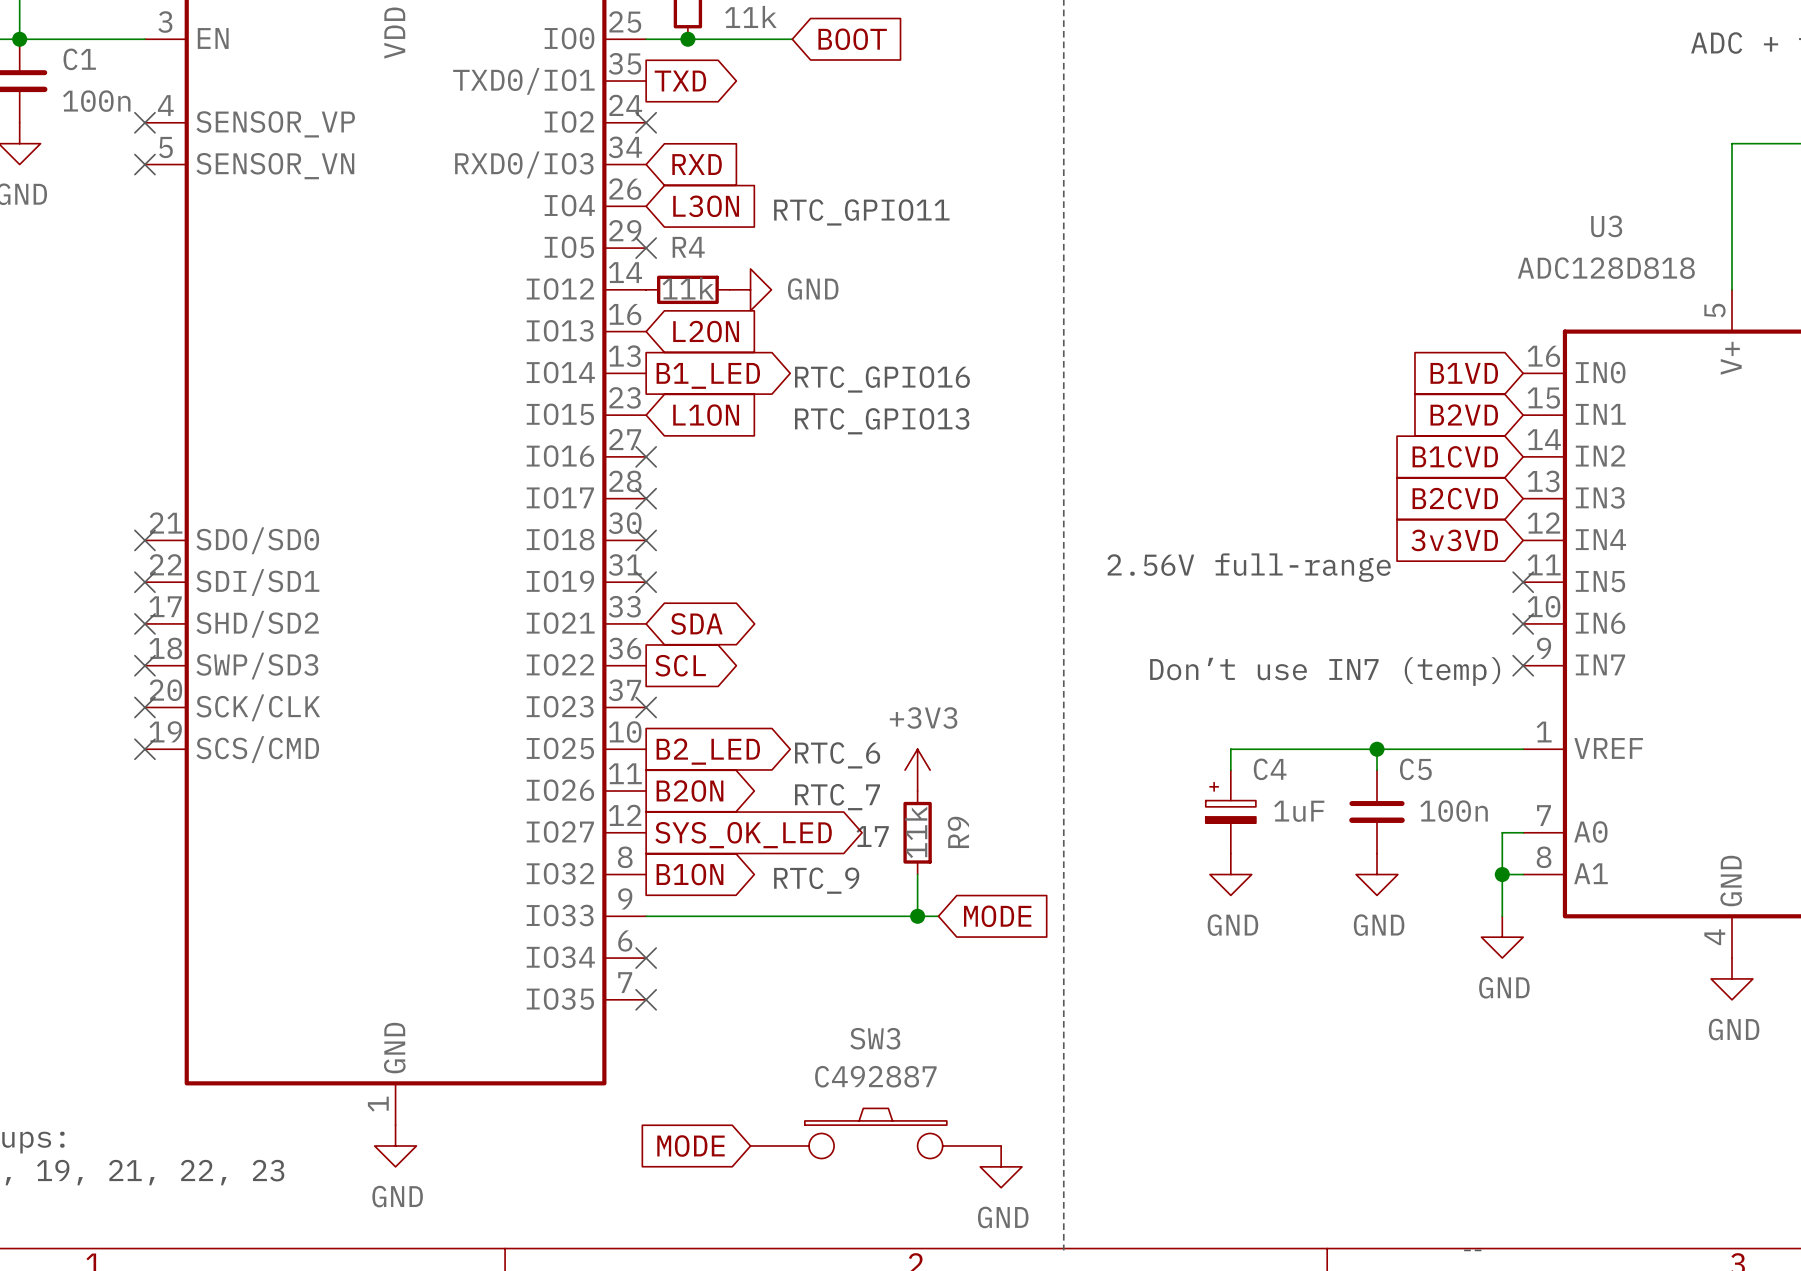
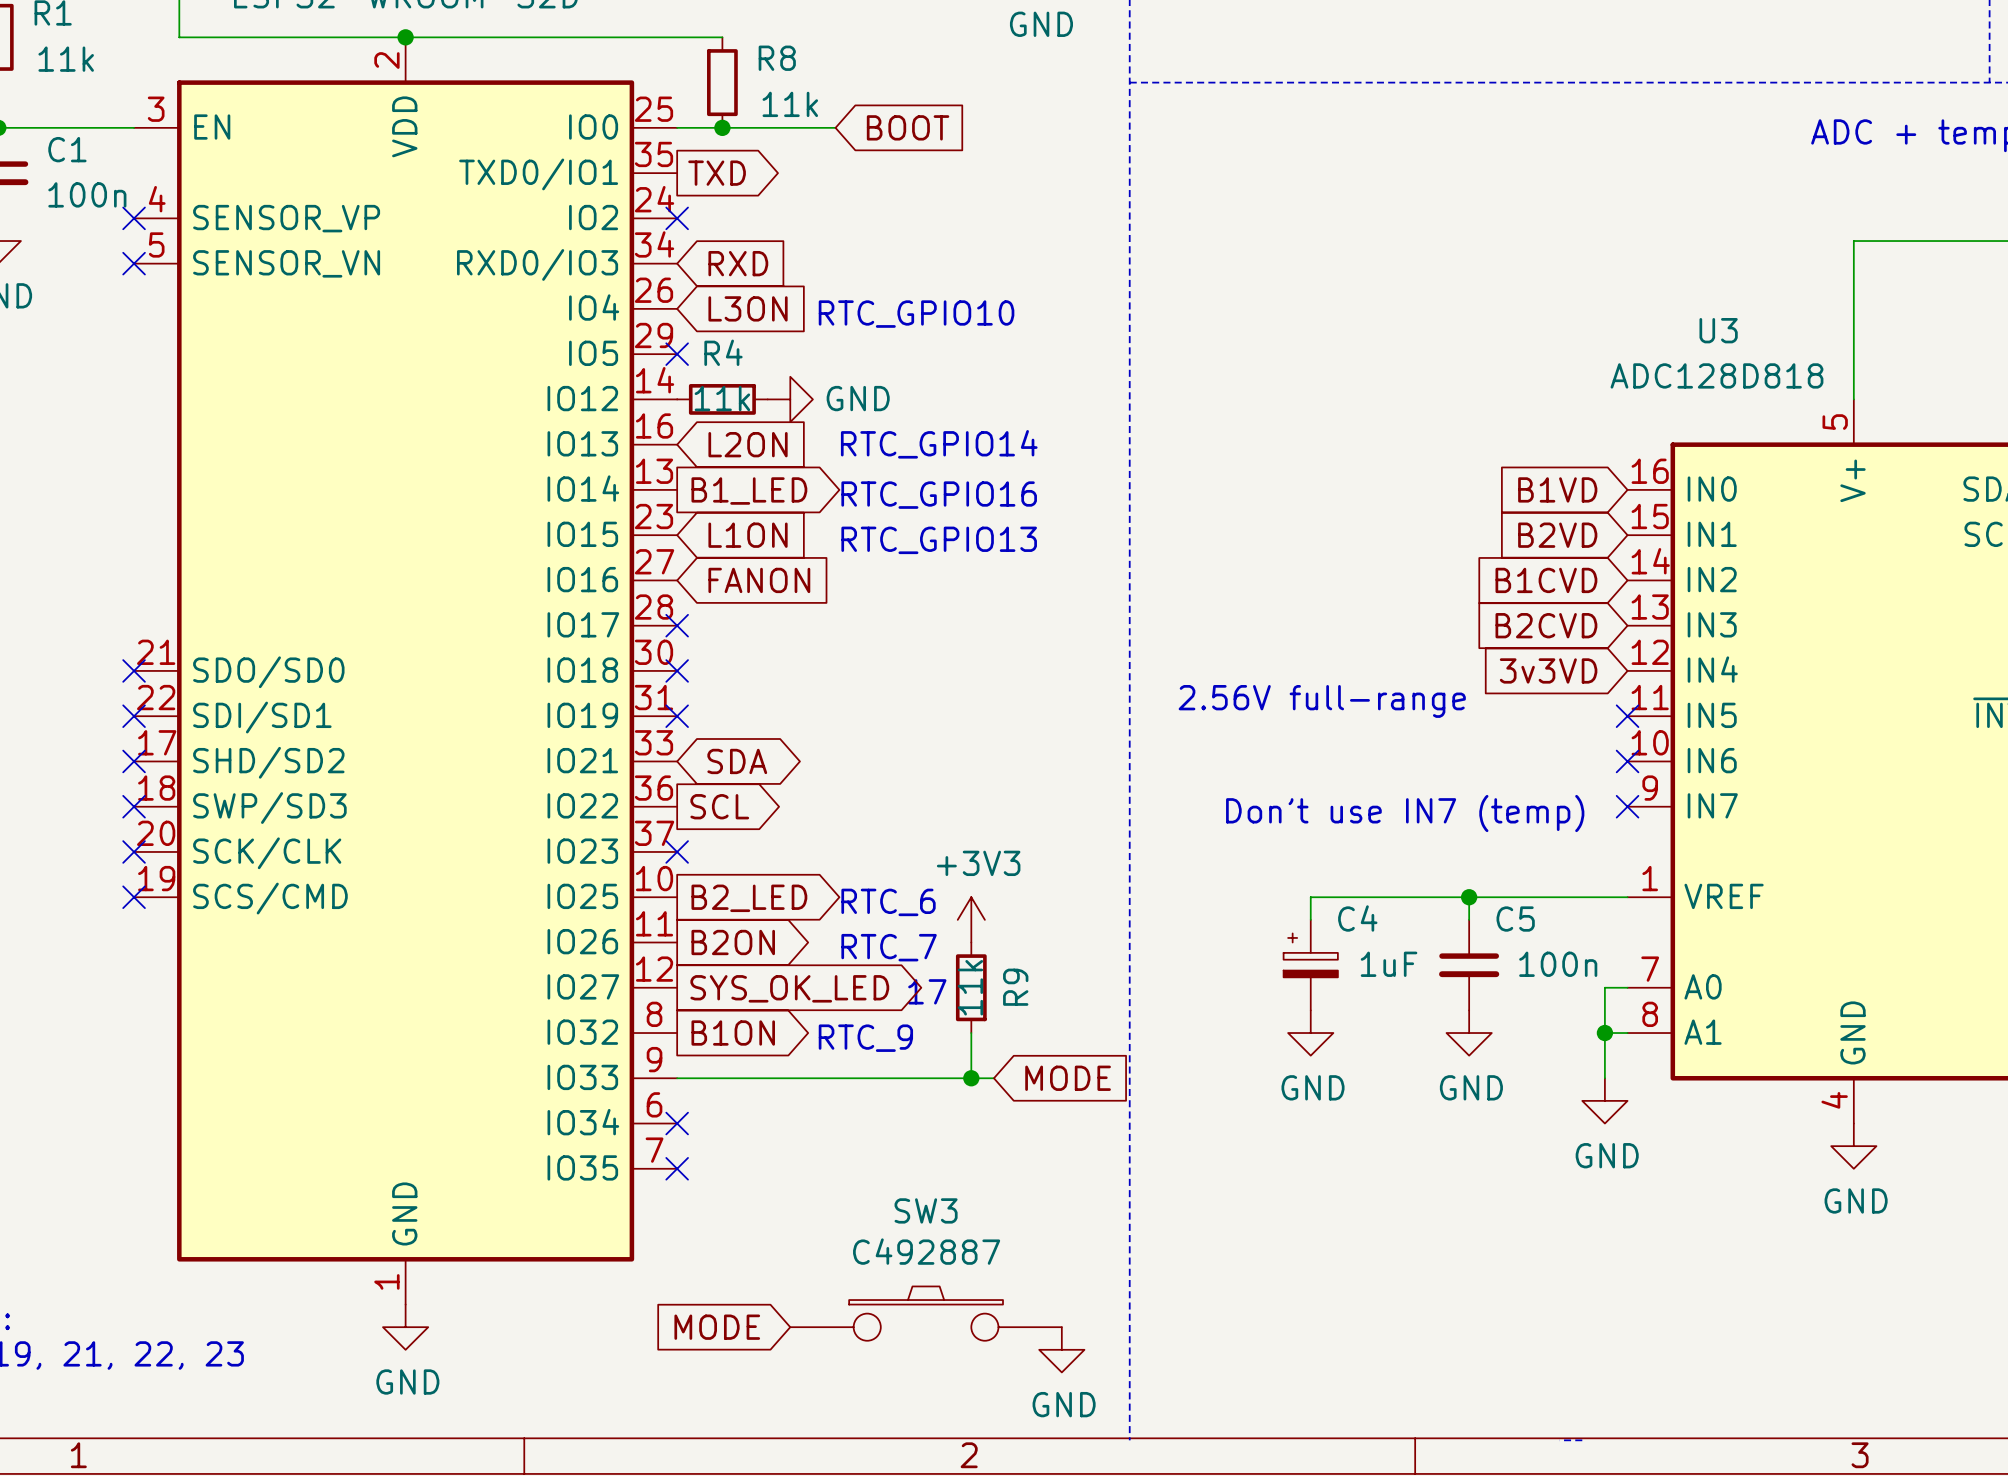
text: RTC_GPIO11 (861, 212) -> RTC_GPIO10 (916, 314)
text: none -> RTC_GPIO14 (939, 444)
no-connect mark: (646, 456) -> none
global label: none -> FANON (759, 580)

